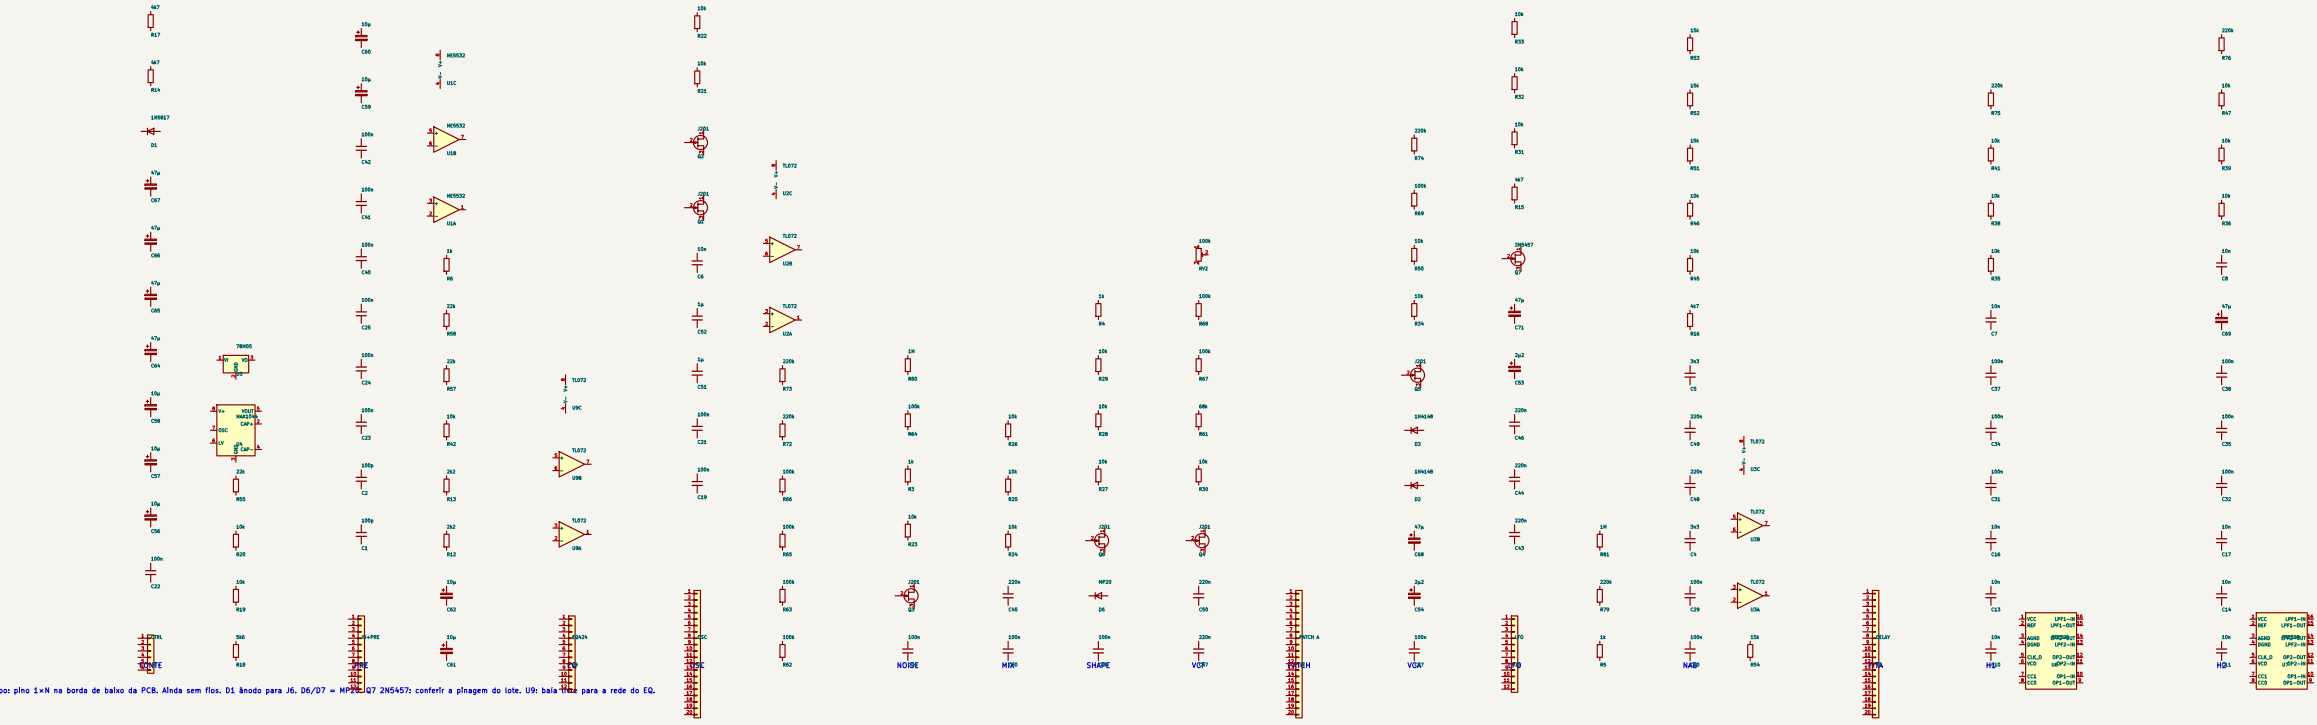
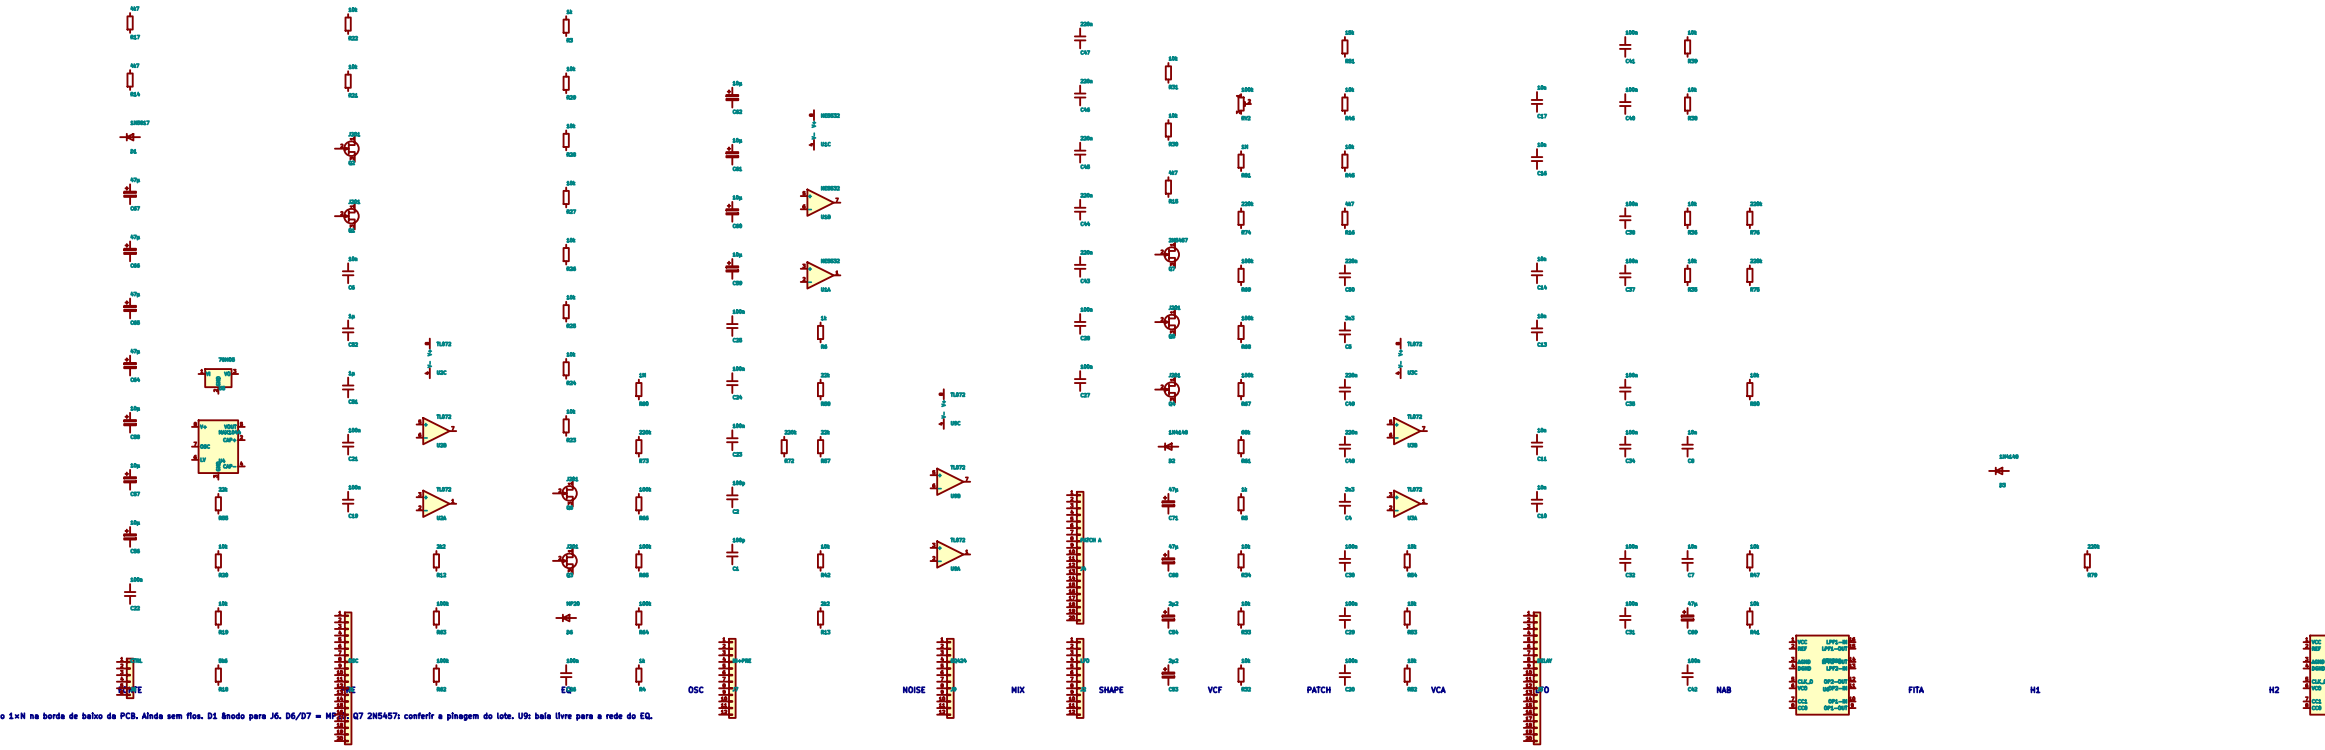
part position: (697, 22) -> (348, 24)
part position: (1514, 27) -> (1241, 618)
part position: (361, 38) -> (732, 211)
part position: (1690, 44) -> (1407, 618)
part position: (2221, 44) -> (1749, 218)
part position: (440, 69) -> (813, 129)
part position: (697, 77) -> (348, 81)
part position: (1514, 83) -> (1241, 675)
part position: (361, 93) -> (732, 268)
part position: (1690, 99) -> (1407, 675)
part position: (1990, 99) -> (1749, 275)
part position: (2221, 99) -> (1749, 560)
part position: (1514, 138) -> (1168, 72)
part position: (446, 139) -> (820, 202)
part position: (696, 142) -> (347, 148)
part position: (1414, 144) -> (1241, 218)
part position: (361, 148) -> (1687, 675)
part position: (1690, 154) -> (1344, 46)
part position: (1990, 154) -> (1749, 618)
part position: (2221, 154) -> (1687, 46)
part position: (776, 179) -> (429, 358)
part position: (1514, 193) -> (1168, 187)
part position: (1414, 199) -> (1241, 275)
part position: (361, 203) -> (1625, 46)
part position: (696, 207) -> (347, 216)
part position: (446, 209) -> (820, 275)
part position: (1690, 209) -> (1344, 104)
part position: (1990, 209) -> (1687, 104)
part position: (2221, 209) -> (1687, 218)
part position: (782, 249) -> (436, 431)
part position: (1202, 254) -> (1244, 104)
part position: (1414, 254) -> (1749, 389)
part position: (361, 258) -> (1625, 104)
part position: (1513, 258) -> (1167, 254)
part position: (697, 262) -> (348, 273)
part position: (446, 264) -> (820, 332)
part position: (1690, 264) -> (1344, 161)
part position: (1990, 264) -> (1687, 275)
part position: (2221, 264) -> (1687, 446)
part position: (1098, 309) -> (638, 675)
part position: (1198, 309) -> (1241, 332)
part position: (1414, 309) -> (1241, 560)
part position: (361, 313) -> (732, 326)
part position: (1514, 313) -> (1168, 503)
part position: (697, 318) -> (348, 330)
part position: (446, 320) -> (820, 389)
part position: (782, 320) -> (436, 503)
part position: (1690, 320) -> (1344, 218)
part position: (1990, 320) -> (1687, 560)
part position: (2221, 320) -> (1687, 618)
part position: (907, 365) -> (638, 389)
part position: (1098, 365) -> (566, 83)
part position: (1198, 365) -> (1241, 389)
part position: (361, 368) -> (732, 383)
part position: (1514, 368) -> (1168, 675)
part position: (697, 373) -> (348, 387)
part position: (446, 375) -> (820, 446)
part position: (782, 375) -> (638, 446)
part position: (1413, 375) -> (1167, 322)
part position: (1690, 375) -> (1344, 332)
part position: (1990, 375) -> (1625, 275)
part position: (2221, 375) -> (1625, 218)
part position: (565, 394) -> (943, 409)
part position: (907, 420) -> (638, 618)
part position: (1098, 420) -> (566, 140)
part position: (1198, 420) -> (1241, 446)
part position: (361, 424) -> (732, 440)
part position: (1514, 424) -> (1080, 95)
part position: (697, 428) -> (348, 444)
part position: (446, 430) -> (820, 560)
part position: (1008, 430) -> (566, 254)
part position: (1414, 430) -> (1999, 470)
part position: (1690, 430) -> (1344, 389)
part position: (1990, 430) -> (1625, 446)
part position: (2221, 430) -> (1625, 389)
part position: (1743, 455) -> (1400, 358)
part position: (571, 464) -> (950, 481)
part position: (907, 475) -> (566, 26)
part position: (1098, 475) -> (566, 197)
part position: (1198, 475) -> (1168, 129)
part position: (361, 479) -> (732, 497)
part position: (1514, 479) -> (1080, 209)
part position: (697, 483) -> (348, 501)
part position: (446, 485) -> (820, 618)
part position: (782, 485) -> (638, 503)
part position: (1008, 485) -> (566, 311)
part position: (1414, 485) -> (1168, 446)
part position: (1690, 485) -> (1344, 446)
part position: (1990, 485) -> (1625, 618)
part position: (2221, 485) -> (1625, 560)
part position: (1750, 525) -> (1407, 431)
part position: (907, 530) -> (566, 425)
part position: (361, 534) -> (732, 554)
part position: (571, 534) -> (950, 554)
part position: (1514, 534) -> (1080, 266)
part position: (782, 540) -> (638, 560)
part position: (1008, 540) -> (566, 368)
part position: (1097, 540) -> (565, 493)
part position: (1197, 540) -> (1167, 389)
part position: (1414, 540) -> (1168, 560)
part position: (1599, 540) -> (1241, 161)
part position: (1690, 540) -> (1344, 503)
part position: (1990, 540) -> (1537, 159)
part position: (2221, 540) -> (1537, 101)
part position: (446, 595) -> (732, 97)
part position: (782, 595) -> (436, 618)
part position: (906, 595) -> (565, 560)
part position: (1008, 595) -> (1080, 152)
part position: (1098, 595) -> (566, 618)
part position: (1198, 595) -> (1344, 275)
part position: (1414, 595) -> (1168, 618)
part position: (1599, 595) -> (2087, 560)
part position: (1690, 595) -> (1344, 618)
part position: (1750, 595) -> (1407, 503)
part position: (1990, 595) -> (1537, 330)
part position: (2221, 595) -> (1537, 273)
part position: (446, 650) -> (732, 154)
part position: (782, 650) -> (436, 675)
part position: (907, 650) -> (566, 675)
part position: (1008, 650) -> (1344, 560)
part position: (1098, 650) -> (1080, 323)
part position: (1198, 650) -> (1080, 38)
part position: (1414, 650) -> (1080, 381)
part position: (1599, 650) -> (1241, 503)
part position: (1690, 650) -> (1344, 675)
part position: (1750, 650) -> (1407, 560)
part position: (1990, 650) -> (1537, 501)
part position: (2051, 650) -> (1822, 675)
part position: (2221, 650) -> (1537, 444)
part position: (356, 654) -> (727, 678)
part position: (567, 654) -> (945, 678)
part position: (692, 654) -> (343, 678)
part position: (1294, 654) -> (1075, 557)
part position: (1509, 654) -> (1075, 678)
part position: (1870, 654) -> (1532, 678)

